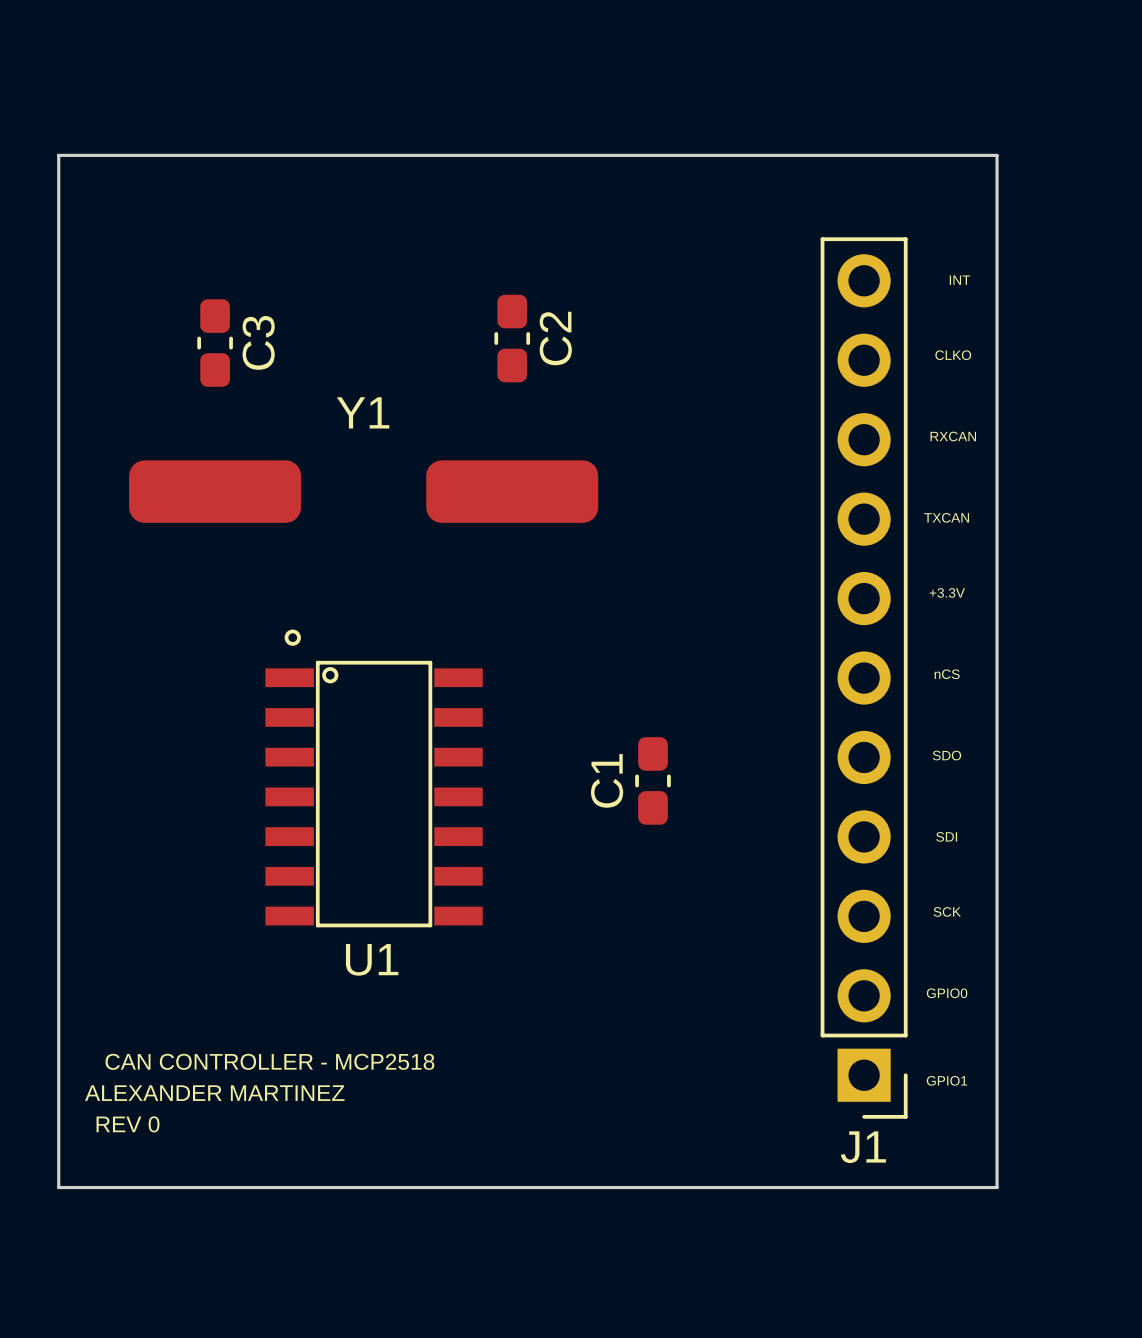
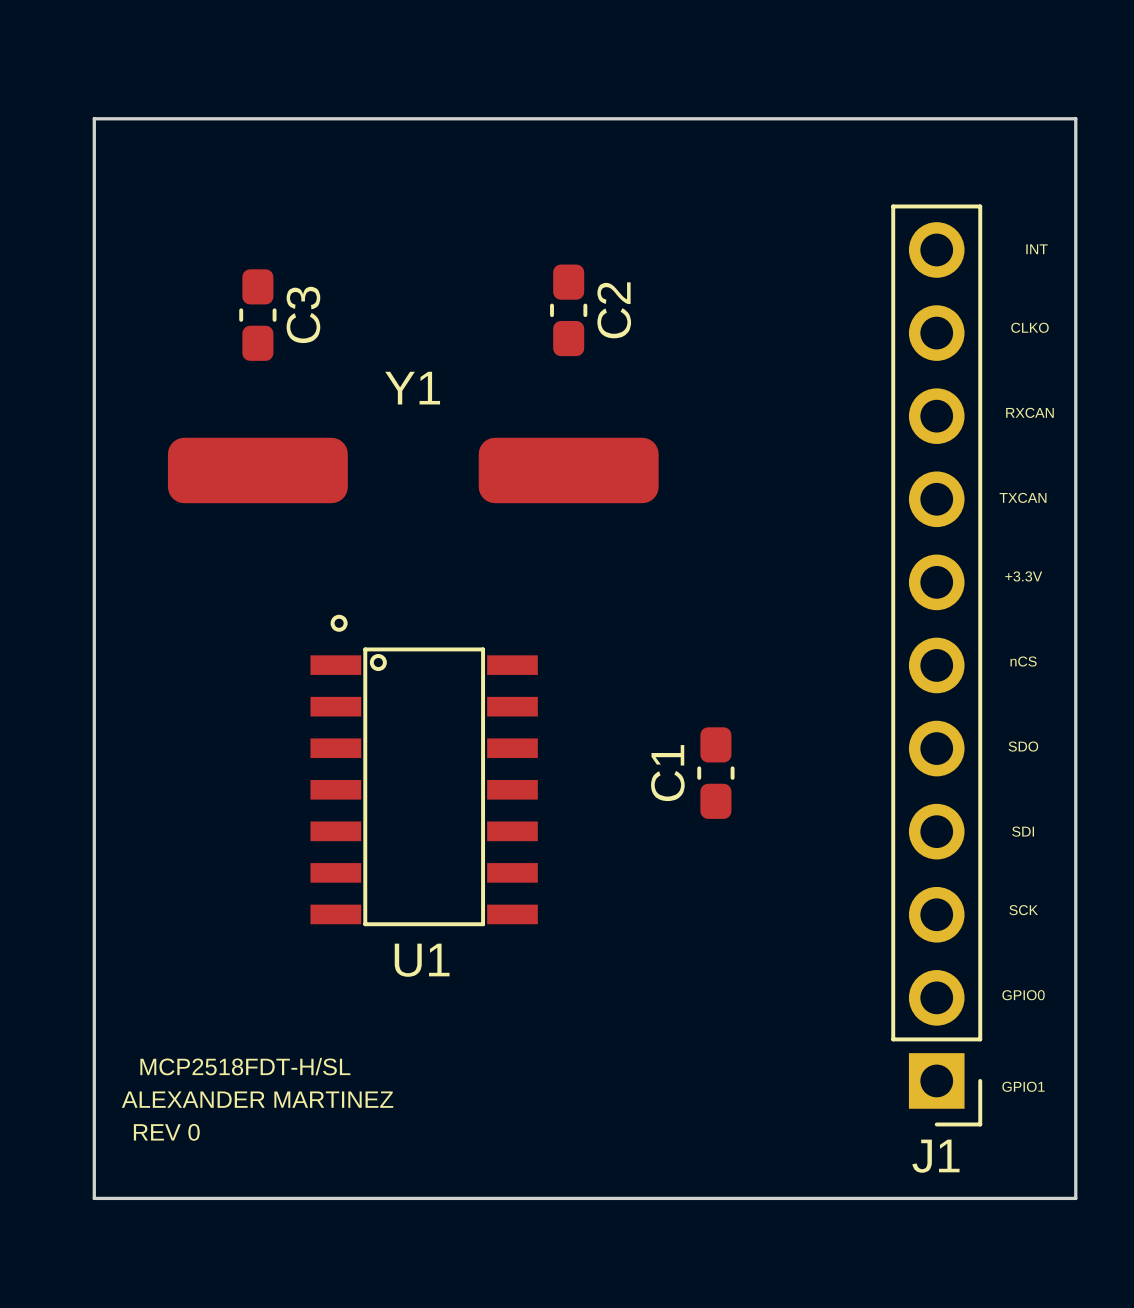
U1 value: CAN CONTROLLER - MCP2518 (269, 1061) -> MCP2518FDT-H/SL (245, 1066)

